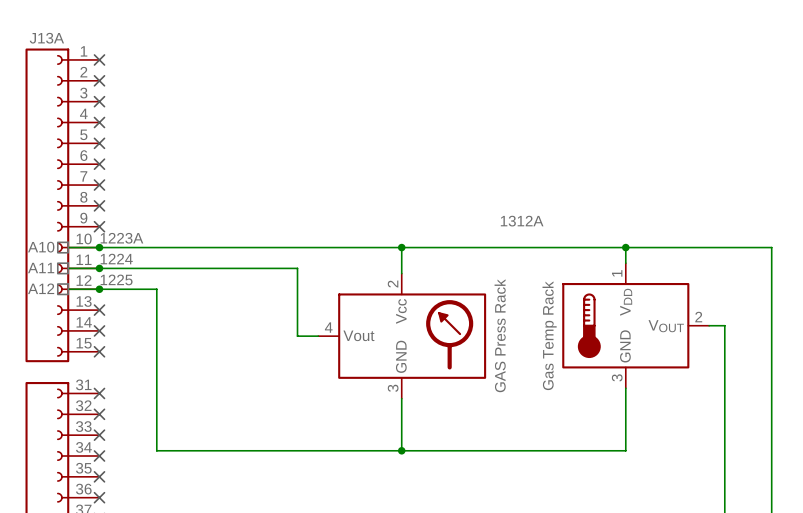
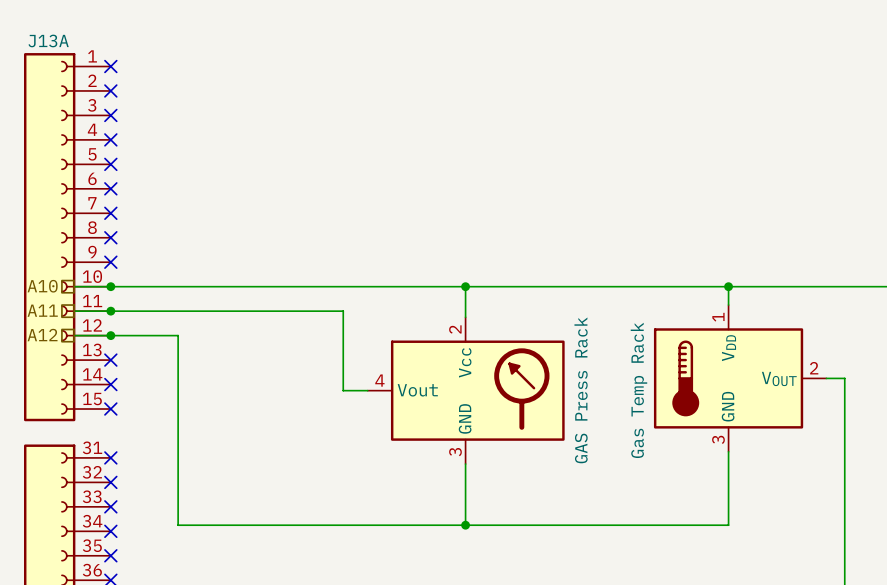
part text: 1312A (522, 221) -> none
label: 1223A (121, 238) -> none
label: 1224 (116, 259) -> none
label: 1225 (116, 279) -> none

